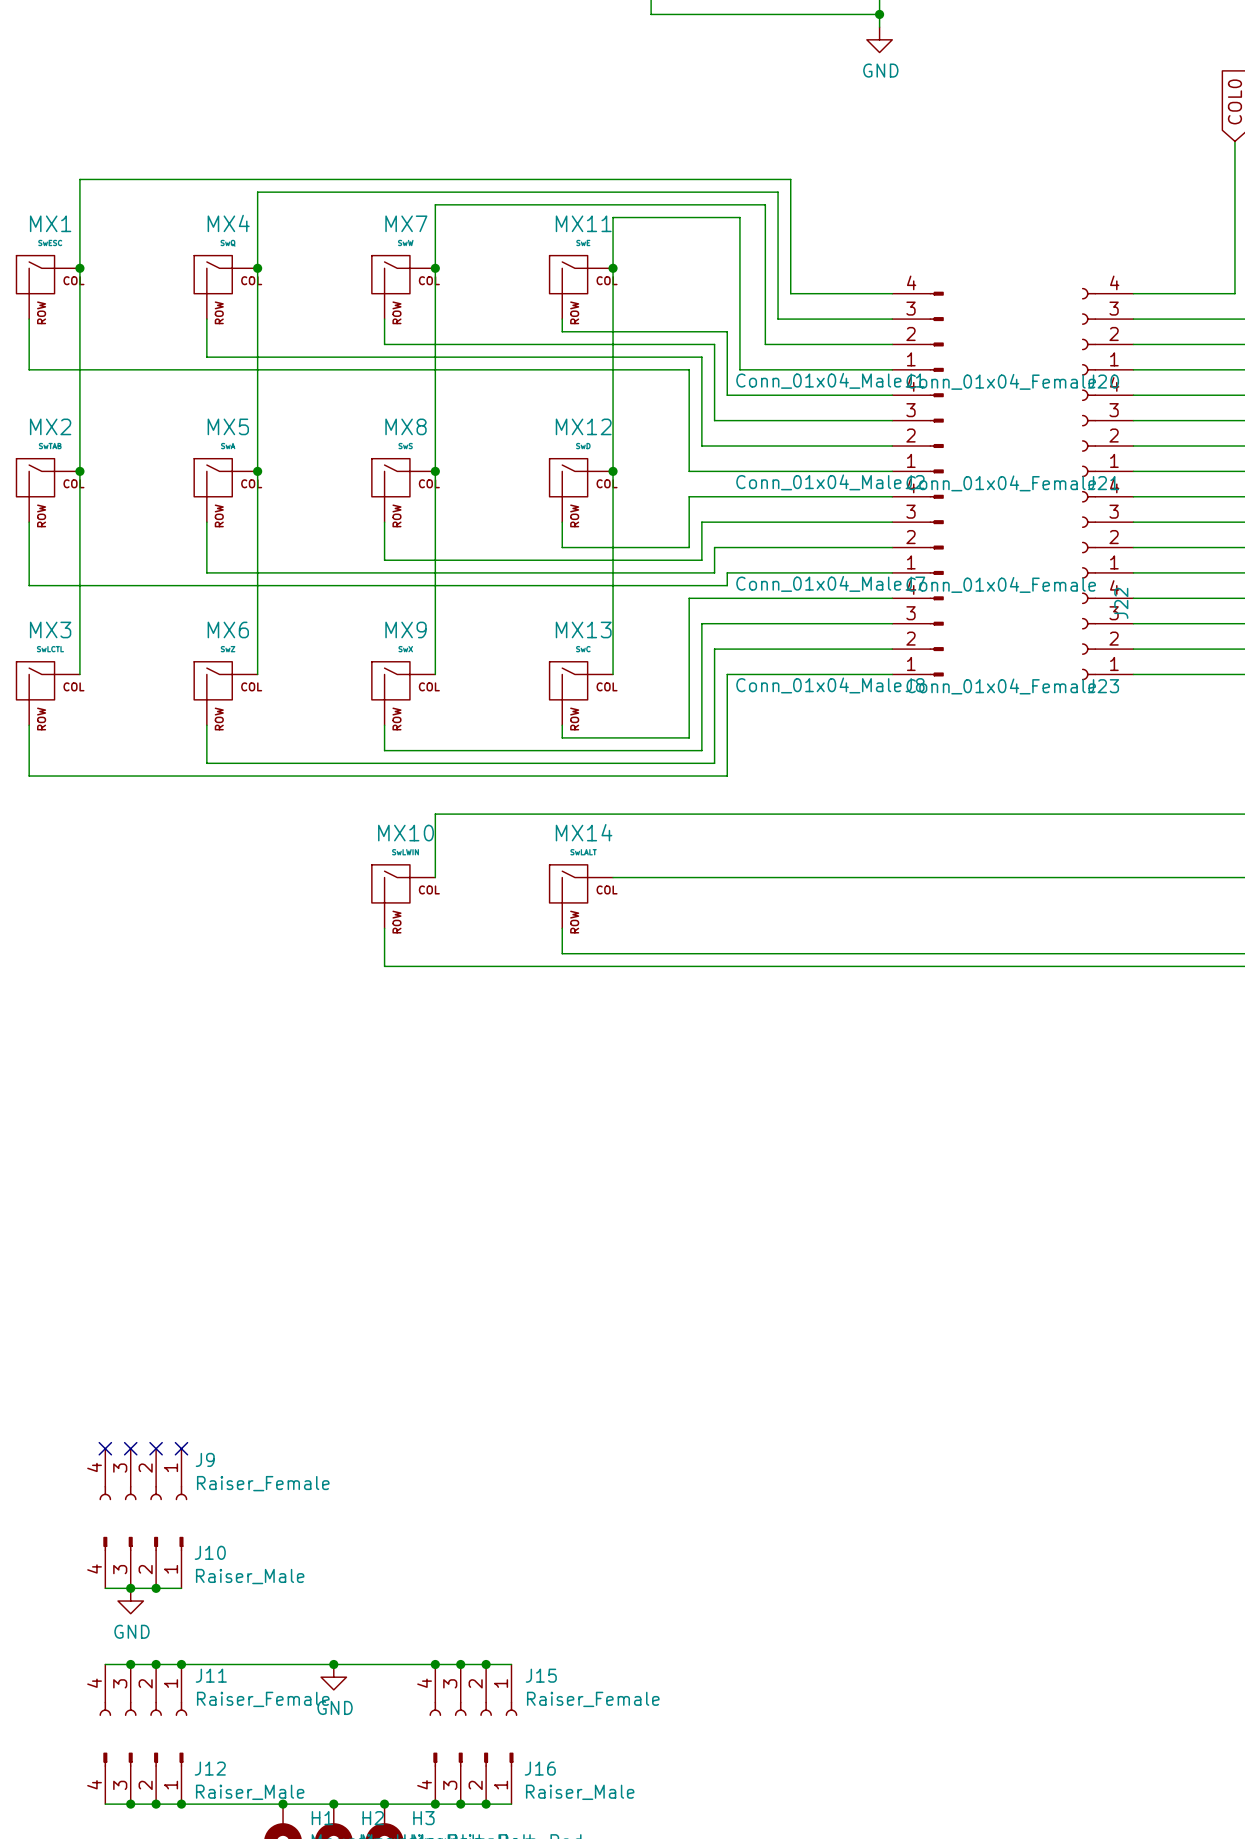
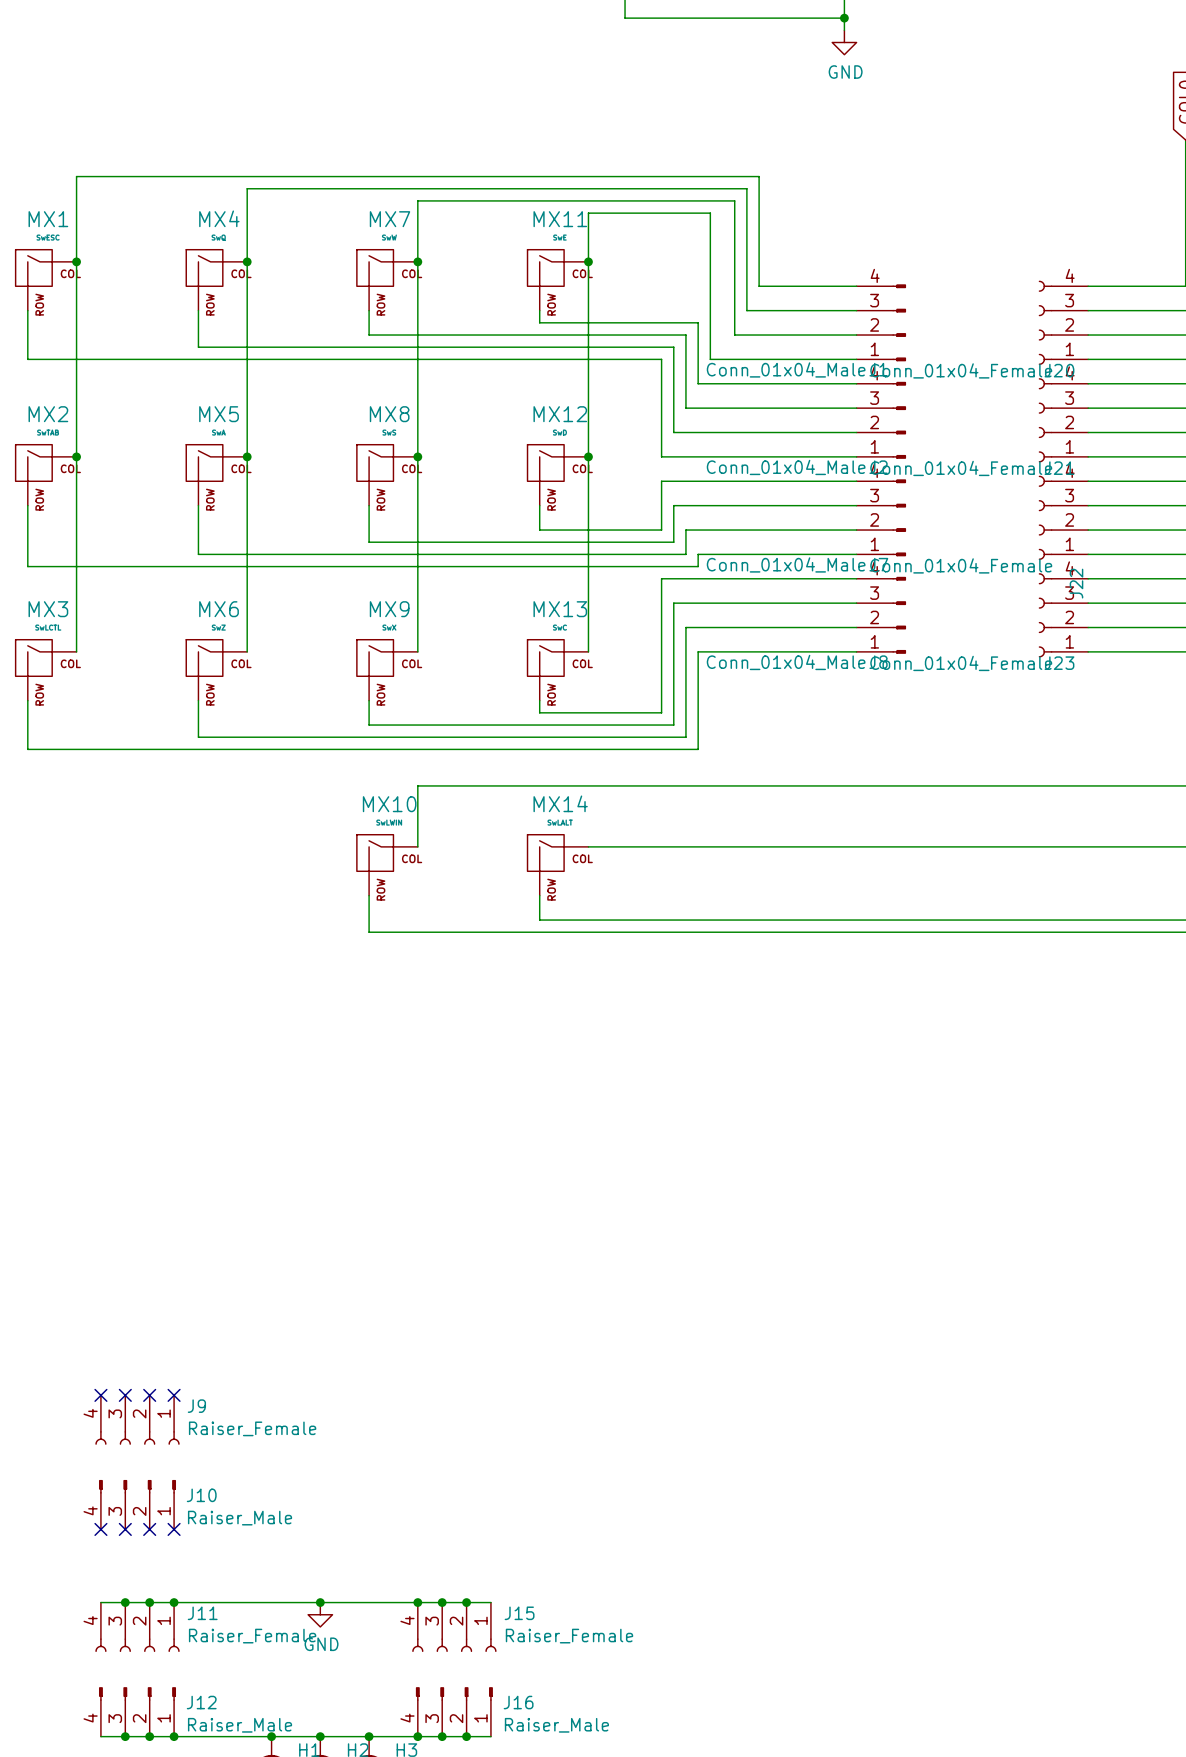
wire: (105, 1588) (181, 1588) -> none
no-connect mark: none -> (100, 1529)
junction: (130, 1588) -> none
no-connect mark: none -> (125, 1529)
junction: (156, 1588) -> none
no-connect mark: none -> (149, 1529)
no-connect mark: none -> (174, 1529)
power symbol: GND (130, 1601) -> none

